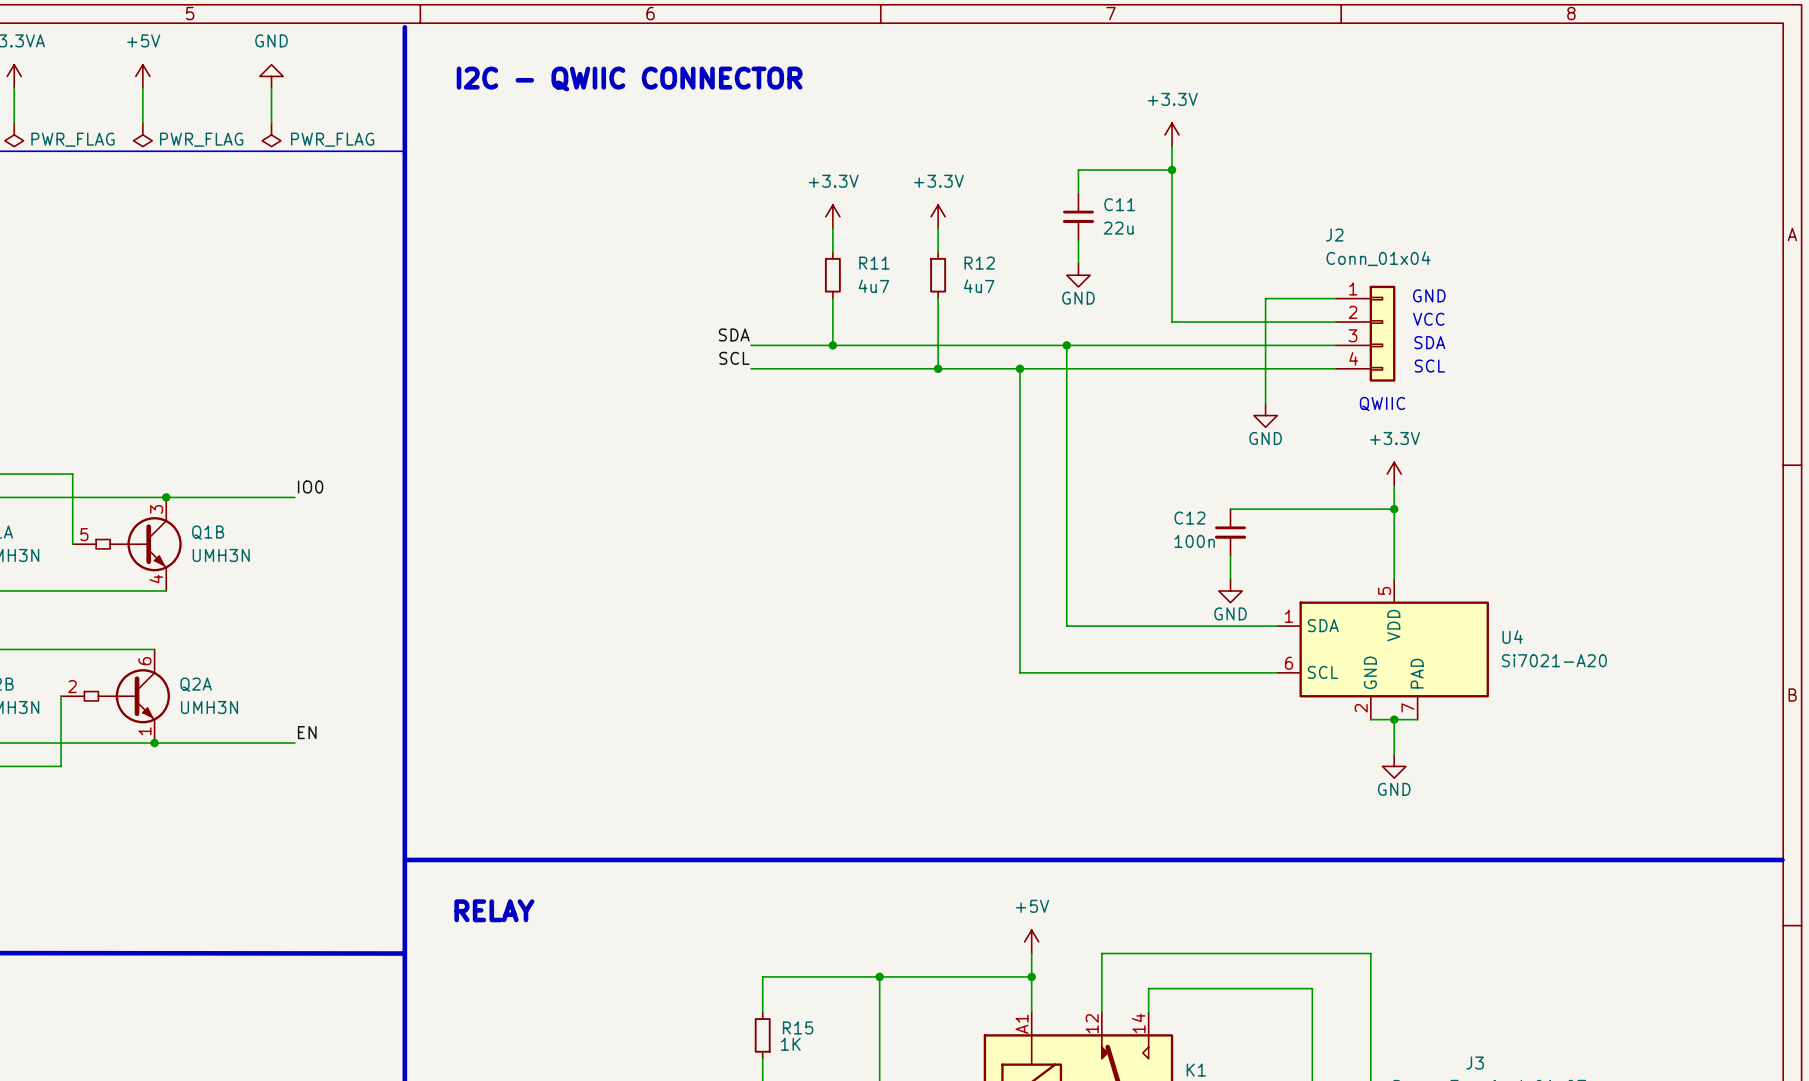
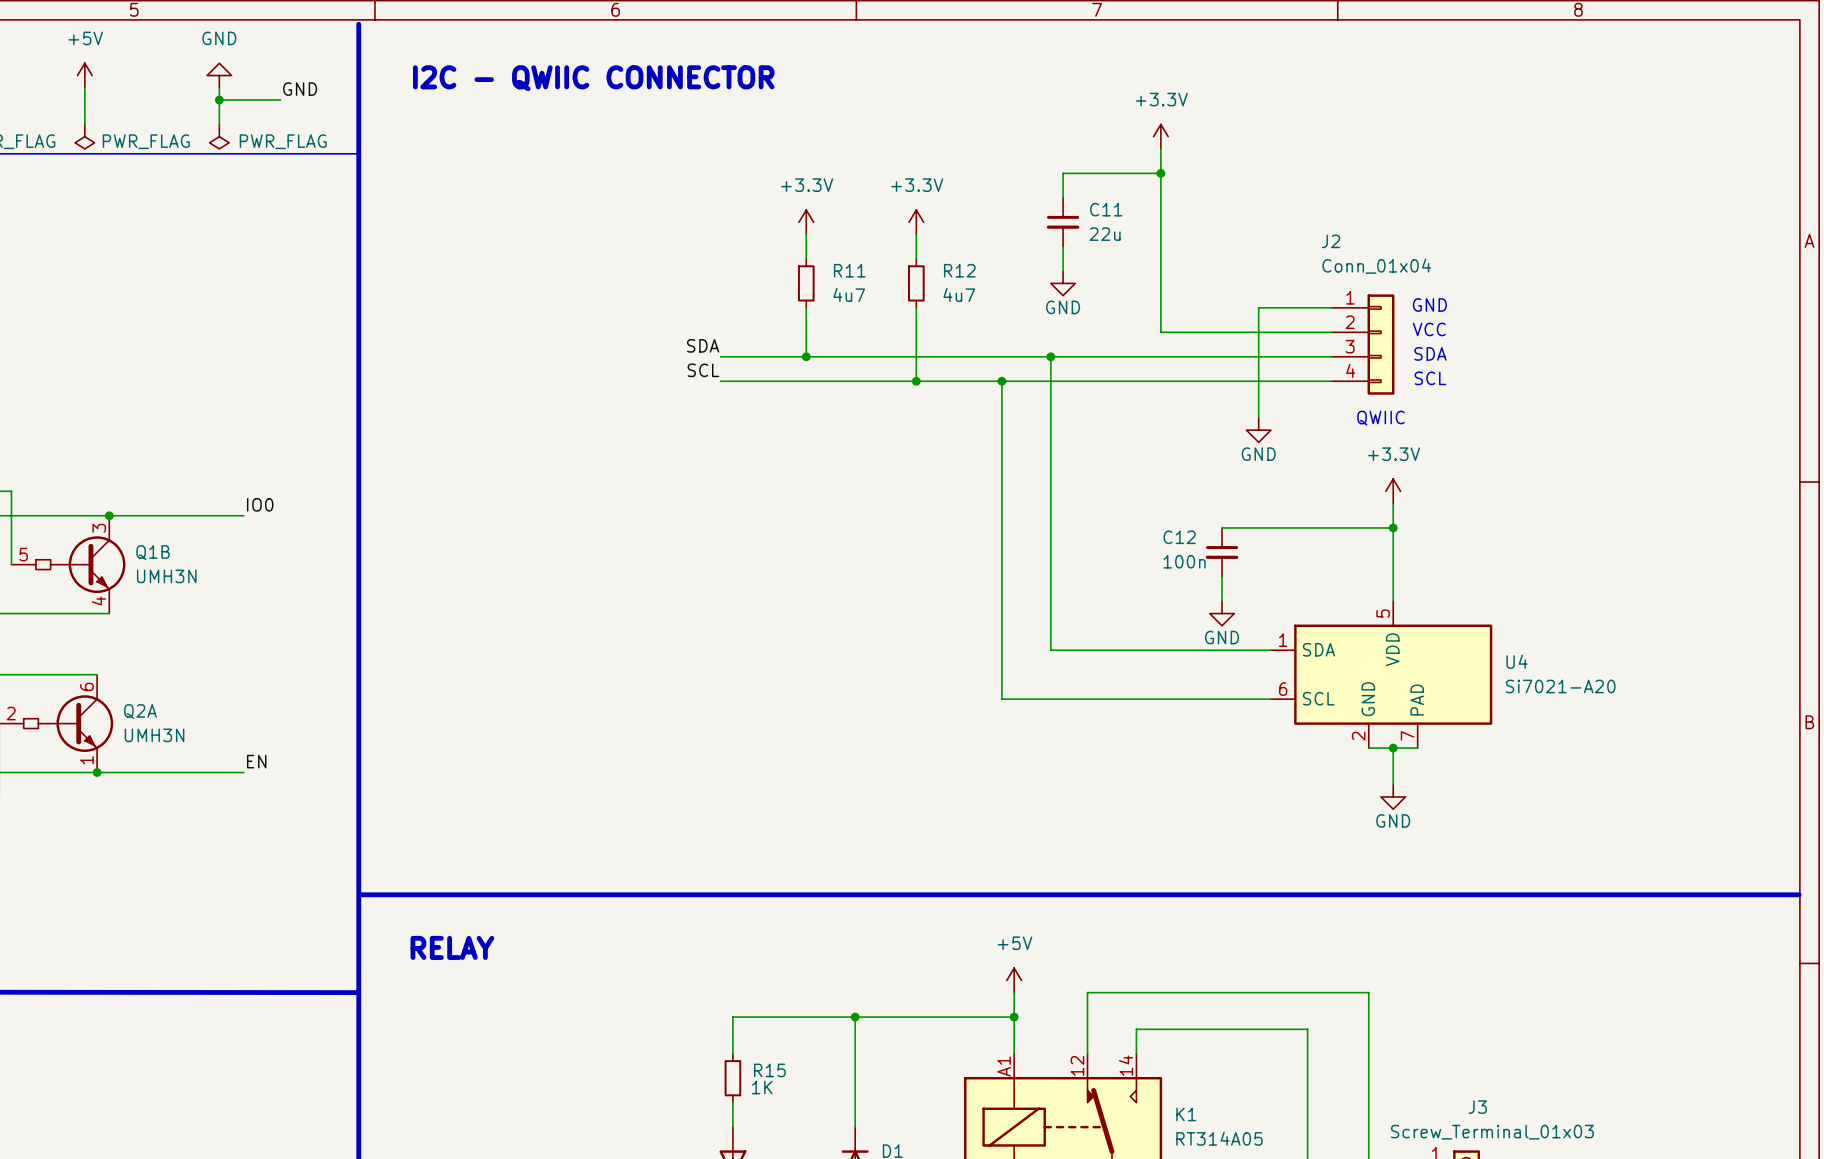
label: none -> GND (300, 89)
wire: none -> (219, 100) (280, 100)
junction: none -> (219, 100)

